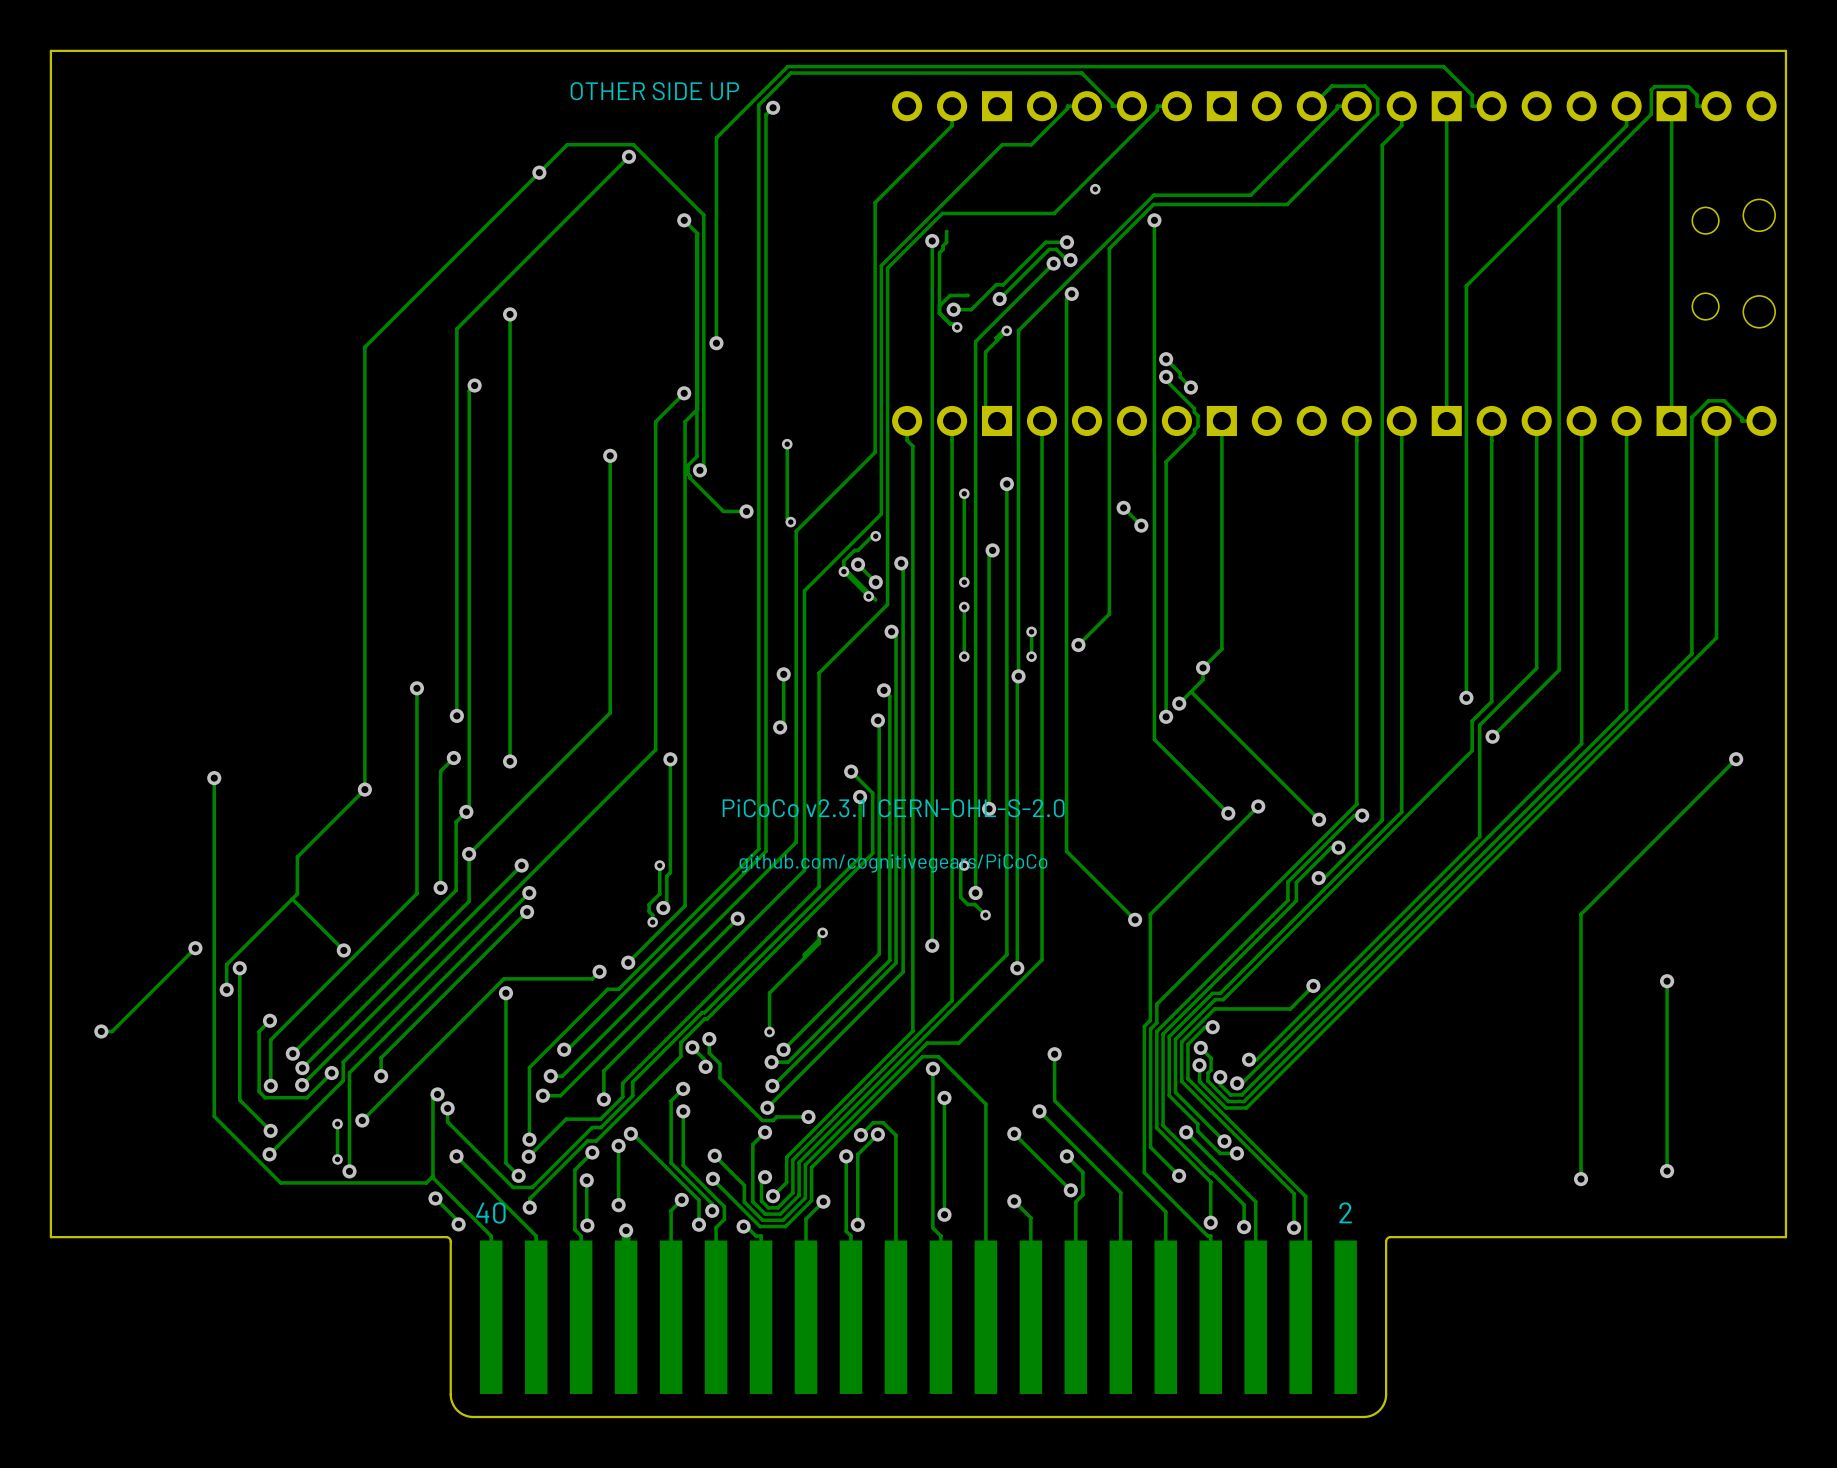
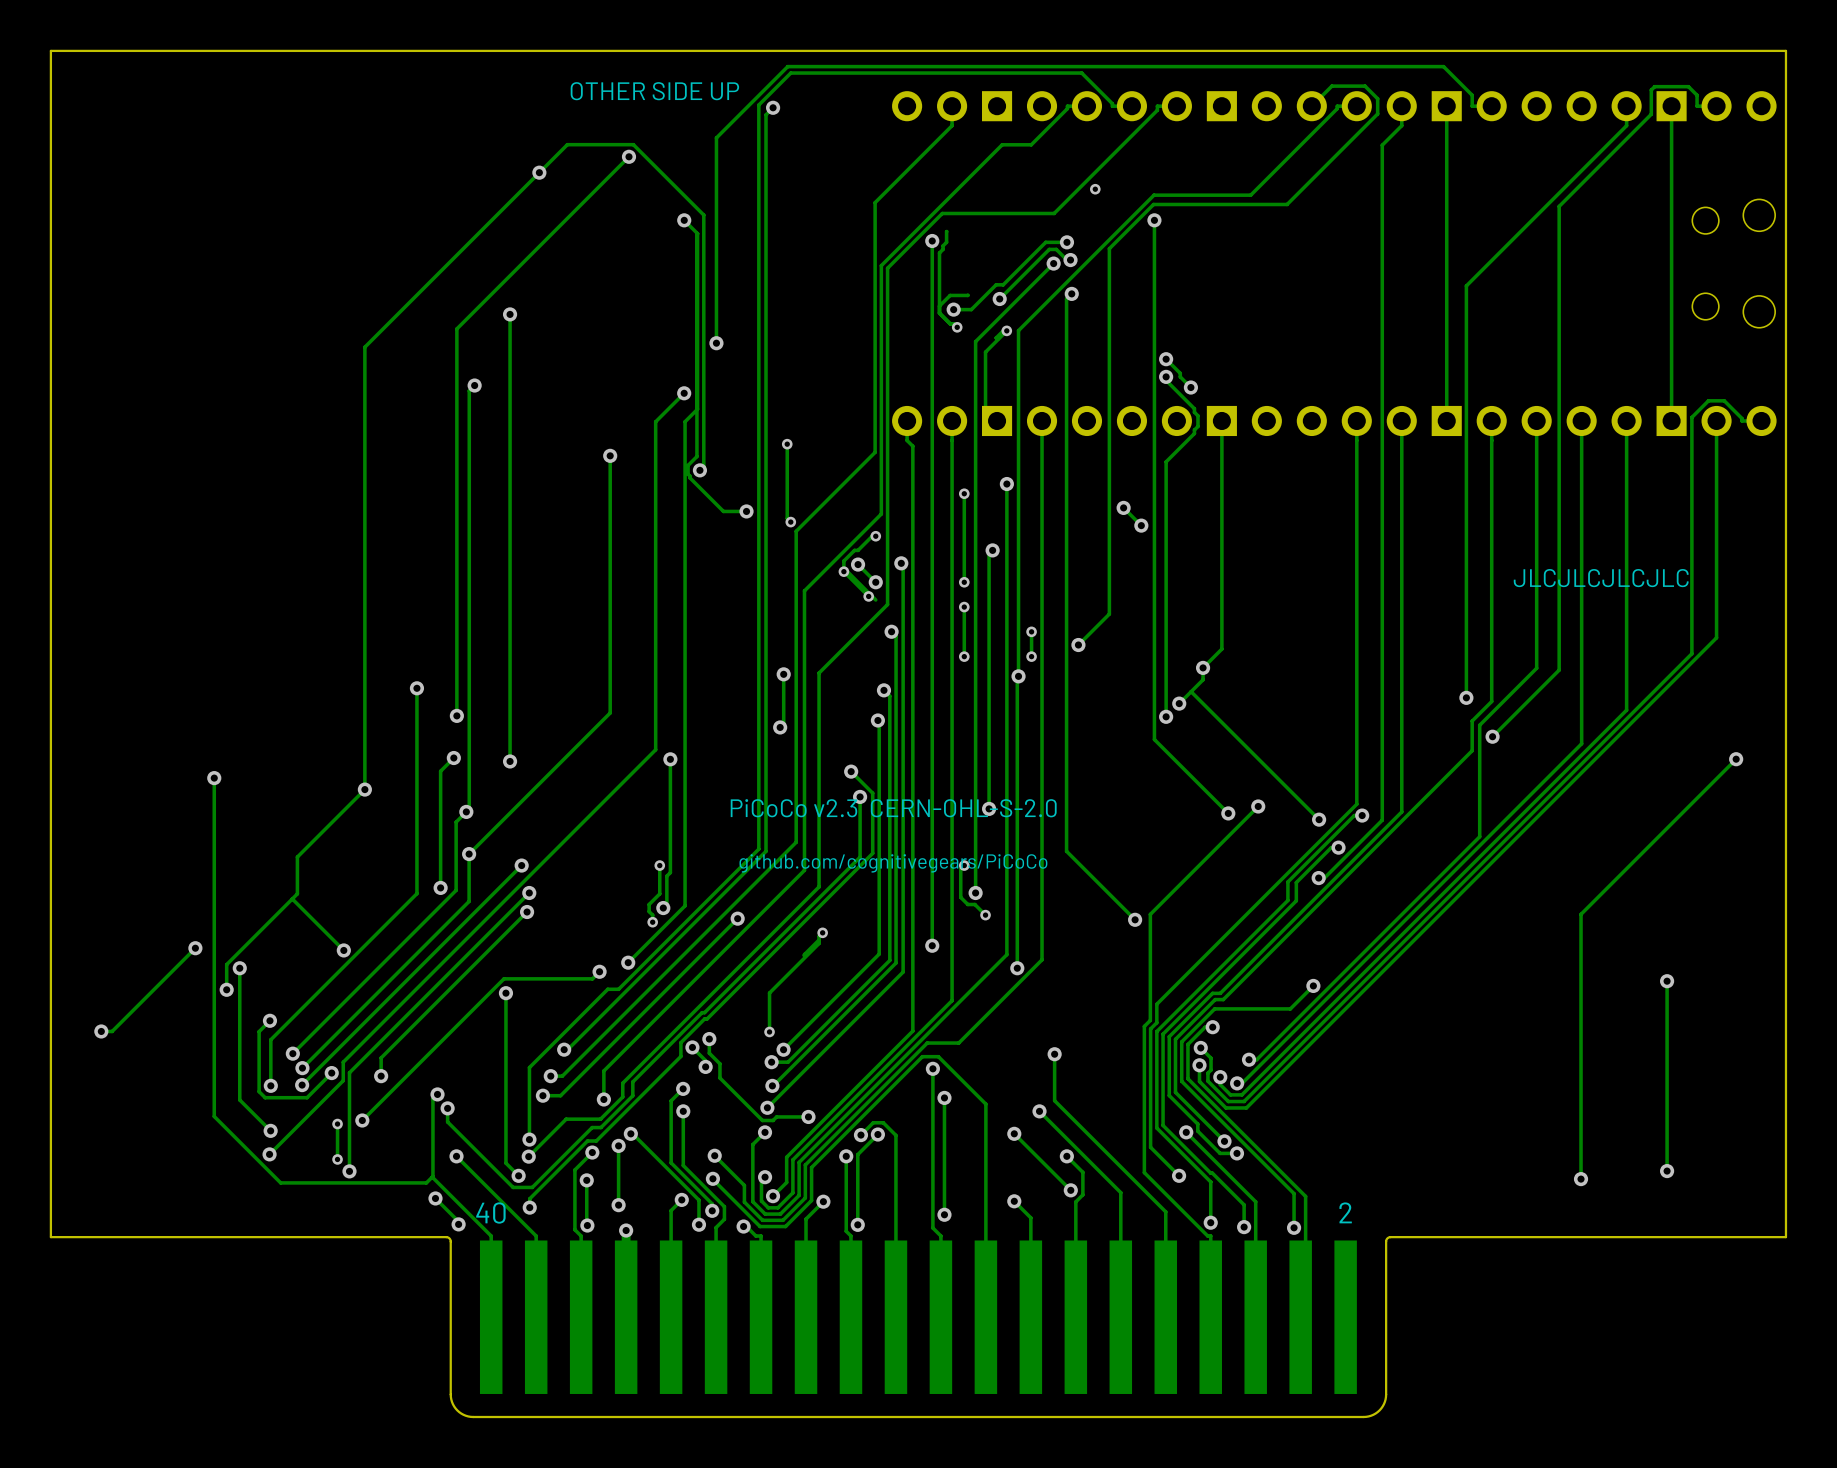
text: none -> JLCJLCJLCJLC (1601, 578)
text: PiCoCo v2.3.1 CERN-OHL-S-2.0 (893, 808) -> PiCoCo v2.3 CERN-OHL-S-2.0 (893, 808)

